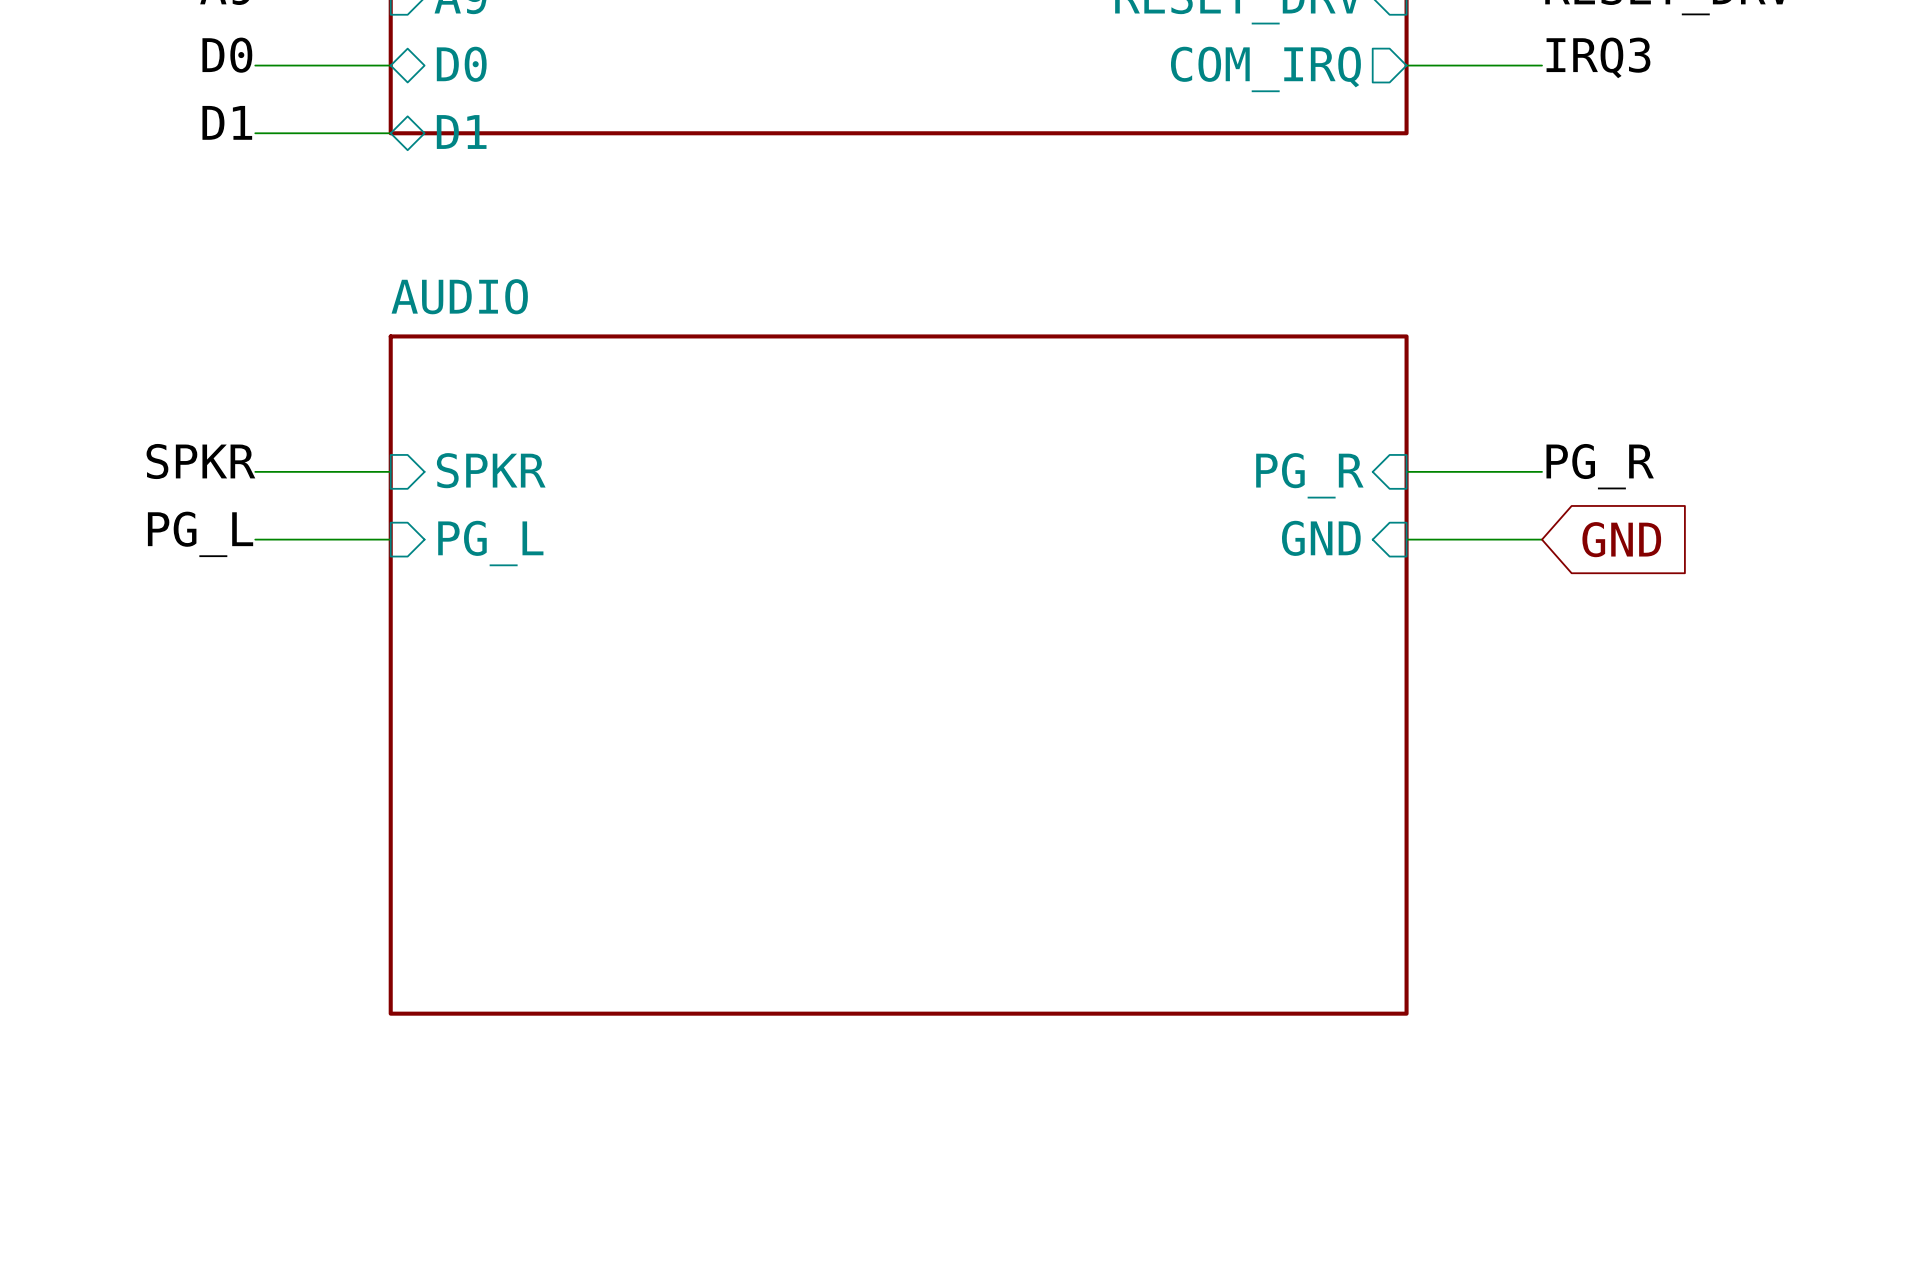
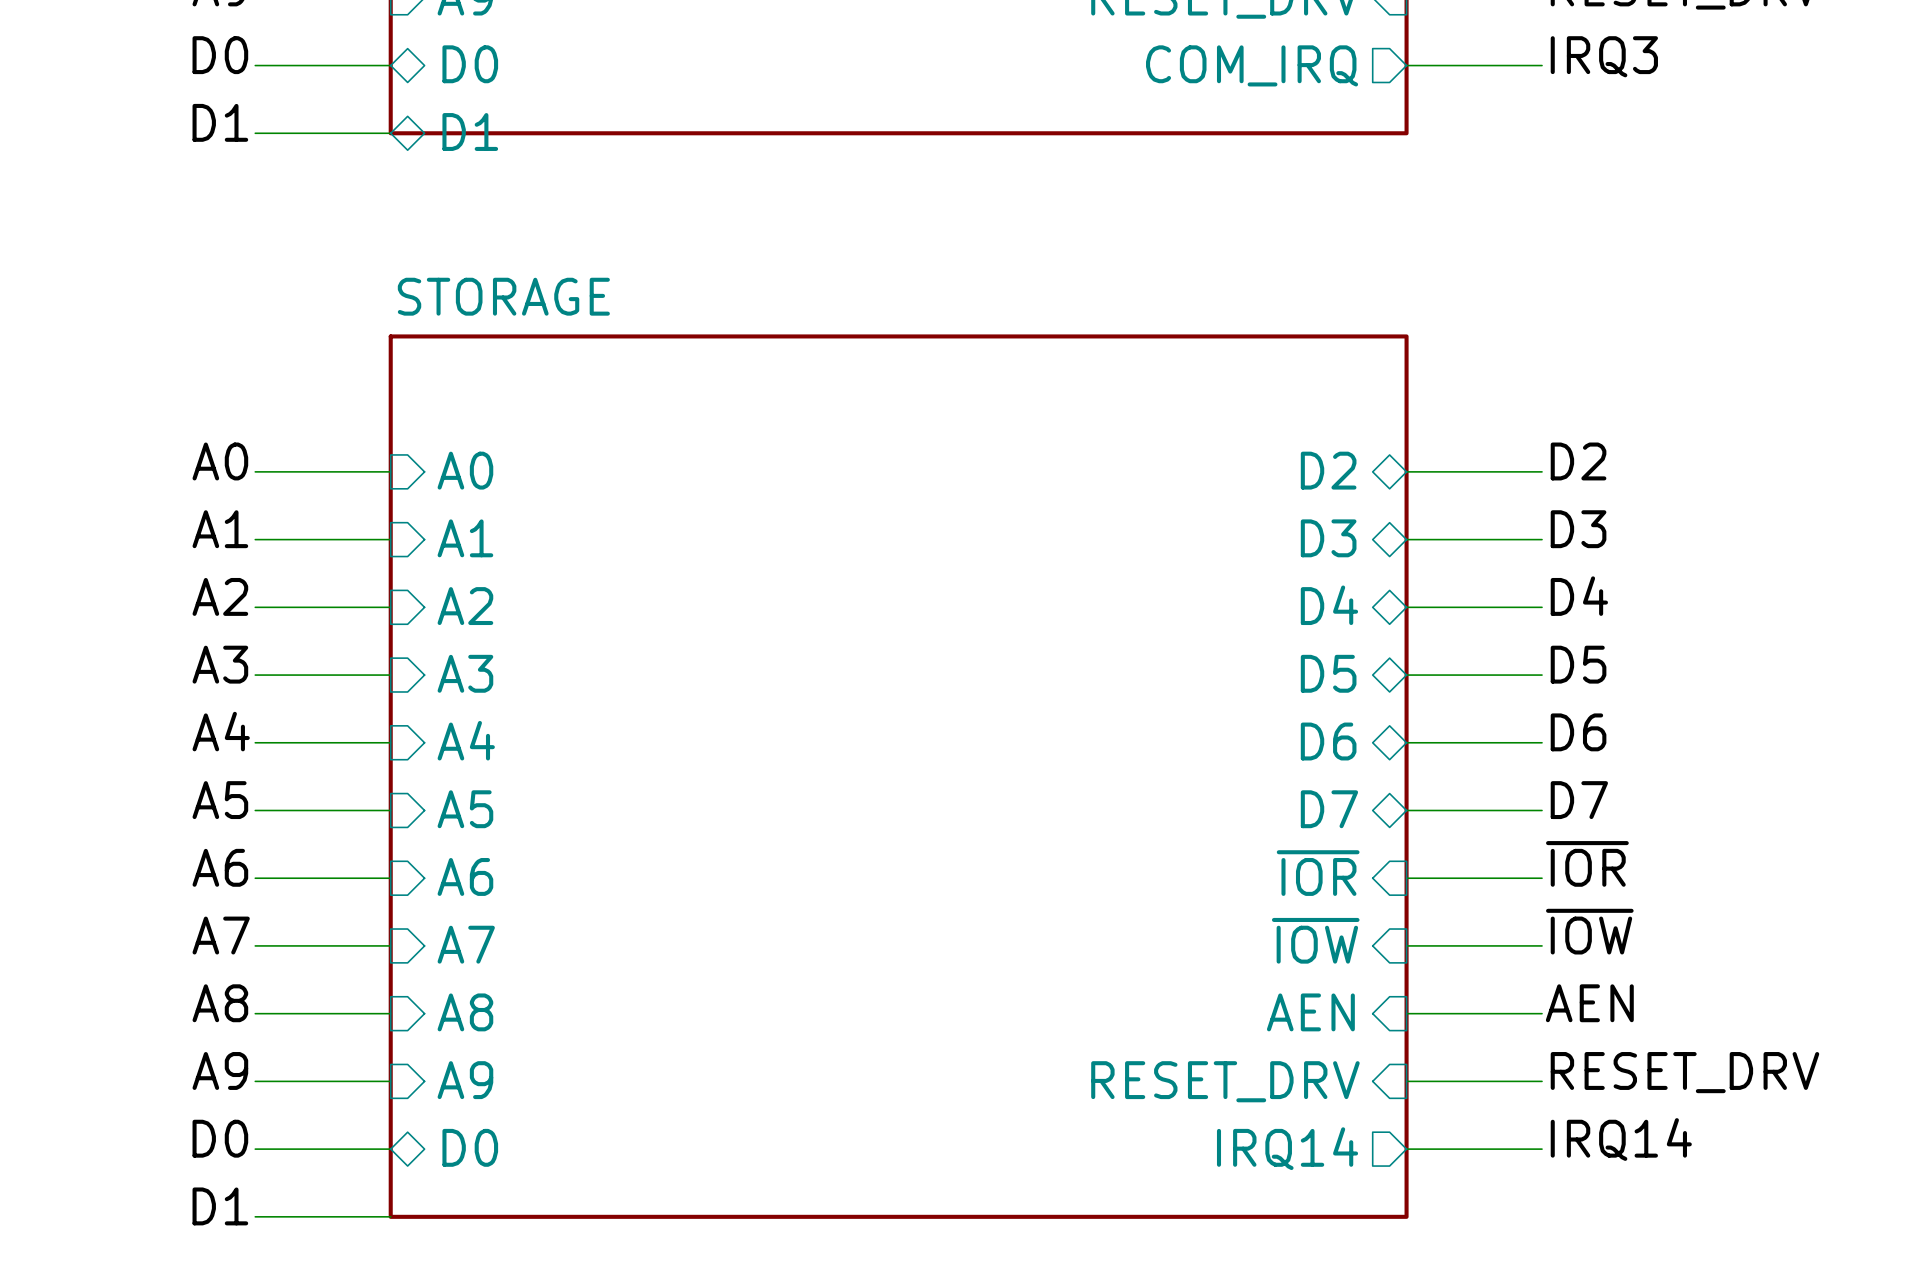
label: SPKR (200, 461) -> A0 (220, 461)
label: PG_R (1600, 466) -> D2 (1578, 461)
sheet pin: SPKR (491, 470) -> A0 (465, 470)
sheet pin shape: input (1309, 475) -> bidirectional (1328, 470)
sheet pin: PG_R (1309, 475) -> D2 (1328, 470)
label: none -> D3 (1578, 529)
label: PG_L (200, 534) -> A1 (220, 529)
sheet pin shape: input (1321, 538) -> bidirectional (1328, 538)
sheet pin: GND (1321, 538) -> D3 (1328, 538)
global label: GND (1621, 539) -> none
sheet pin: PG_L (490, 543) -> A1 (465, 538)
label: none -> A2 (220, 596)
label: none -> D4 (1579, 596)
sheet pin: none -> A2 (465, 606)
sheet pin: none -> D4 (1329, 605)
wire: none -> (255, 607) (390, 607)
wire: none -> (1406, 607) (1542, 607)
label: none -> A3 (220, 664)
label: none -> D5 (1578, 664)
sheet pin: none -> A3 (465, 673)
sheet pin: none -> D5 (1328, 673)
wire: none -> (255, 675) (390, 675)
sheet AUDIO: (898, 675) -> none
wire: none -> (1406, 675) (1542, 675)
label: none -> A4 (221, 731)
label: none -> D6 (1578, 732)
sheet pin: none -> A4 (466, 740)
sheet pin: none -> D6 (1328, 741)
wire: none -> (255, 742) (390, 742)
wire: none -> (1406, 742) (1542, 742)
sheet STORAGE: none -> (898, 776)
label: none -> A5 (220, 800)
label: none -> D7 (1579, 800)
sheet pin: none -> A5 (465, 809)
sheet pin: none -> D7 (1329, 809)
wire: none -> (255, 810) (390, 810)
wire: none -> (1406, 810) (1542, 810)
label: none -> ~{IOR} (1587, 863)
label: none -> A6 (220, 867)
sheet pin: none -> ~{IOR} (1318, 873)
sheet pin: none -> A6 (465, 876)
wire: none -> (255, 878) (390, 878)
wire: none -> (1406, 878) (1542, 878)
label: none -> ~{IOW} (1589, 931)
label: none -> A7 (221, 935)
sheet pin: none -> ~{IOW} (1315, 940)
sheet pin: none -> A7 (466, 944)
wire: none -> (255, 945) (390, 945)
wire: none -> (1406, 945) (1542, 945)
label: none -> A8 (220, 1003)
label: none -> AEN (1589, 1003)
sheet pin: none -> A8 (465, 1012)
sheet pin: none -> AEN (1310, 1012)
wire: none -> (255, 1013) (390, 1013)
wire: none -> (1406, 1013) (1542, 1013)
label: none -> A9 (220, 1070)
label: none -> RESET_DRV (1684, 1072)
sheet pin: none -> A9 (465, 1080)
wire: none -> (255, 1081) (390, 1081)
wire: none -> (1406, 1081) (1542, 1081)
sheet pin: none -> RESET_DRV (1225, 1081)
label: none -> D0 (220, 1138)
label: none -> IRQ14 (1621, 1139)
sheet pin: none -> D0 (470, 1147)
wire: none -> (255, 1149) (390, 1149)
wire: none -> (1406, 1149) (1542, 1149)
sheet pin: none -> IRQ14 (1287, 1148)
label: none -> D1 (220, 1206)
wire: none -> (255, 1216) (390, 1216)

